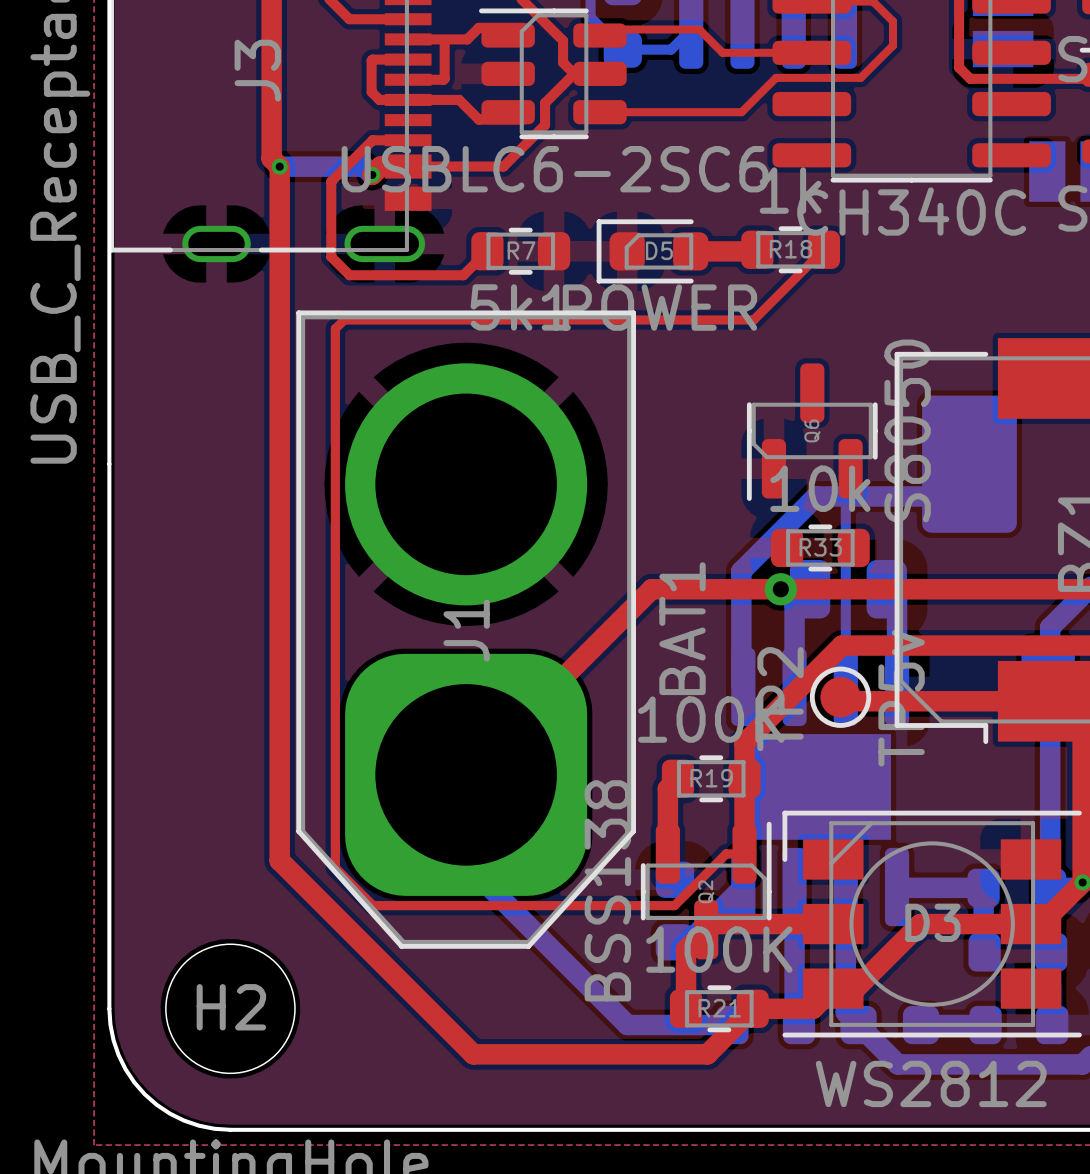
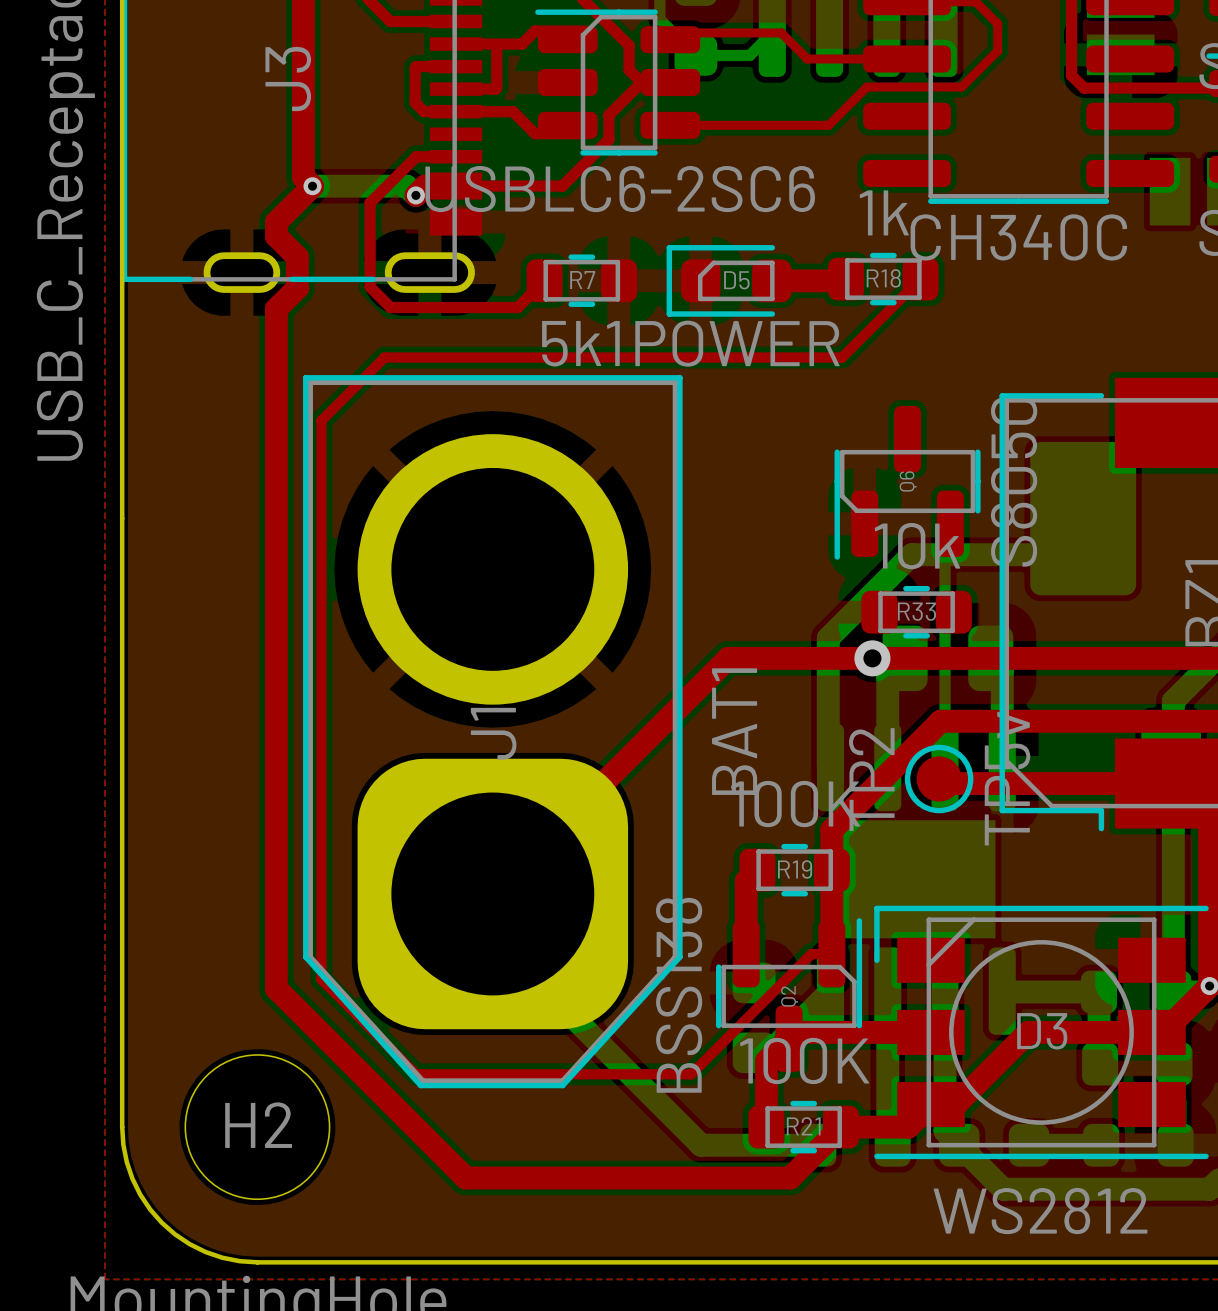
top track: (279, 166) (279, 860) (473, 1054) -> (312, 186) (276, 222) (276, 236) (297, 257) (297, 288) (276, 309) (276, 988) (465, 1177) (528, 1177)
top track: (335, 328) (335, 867) (373, 905) (674, 905) -> (374, 367) (321, 420) (321, 979) (416, 1074) (691, 1074) (753, 1011)
J1 position: (466, 629) -> (492, 731)

